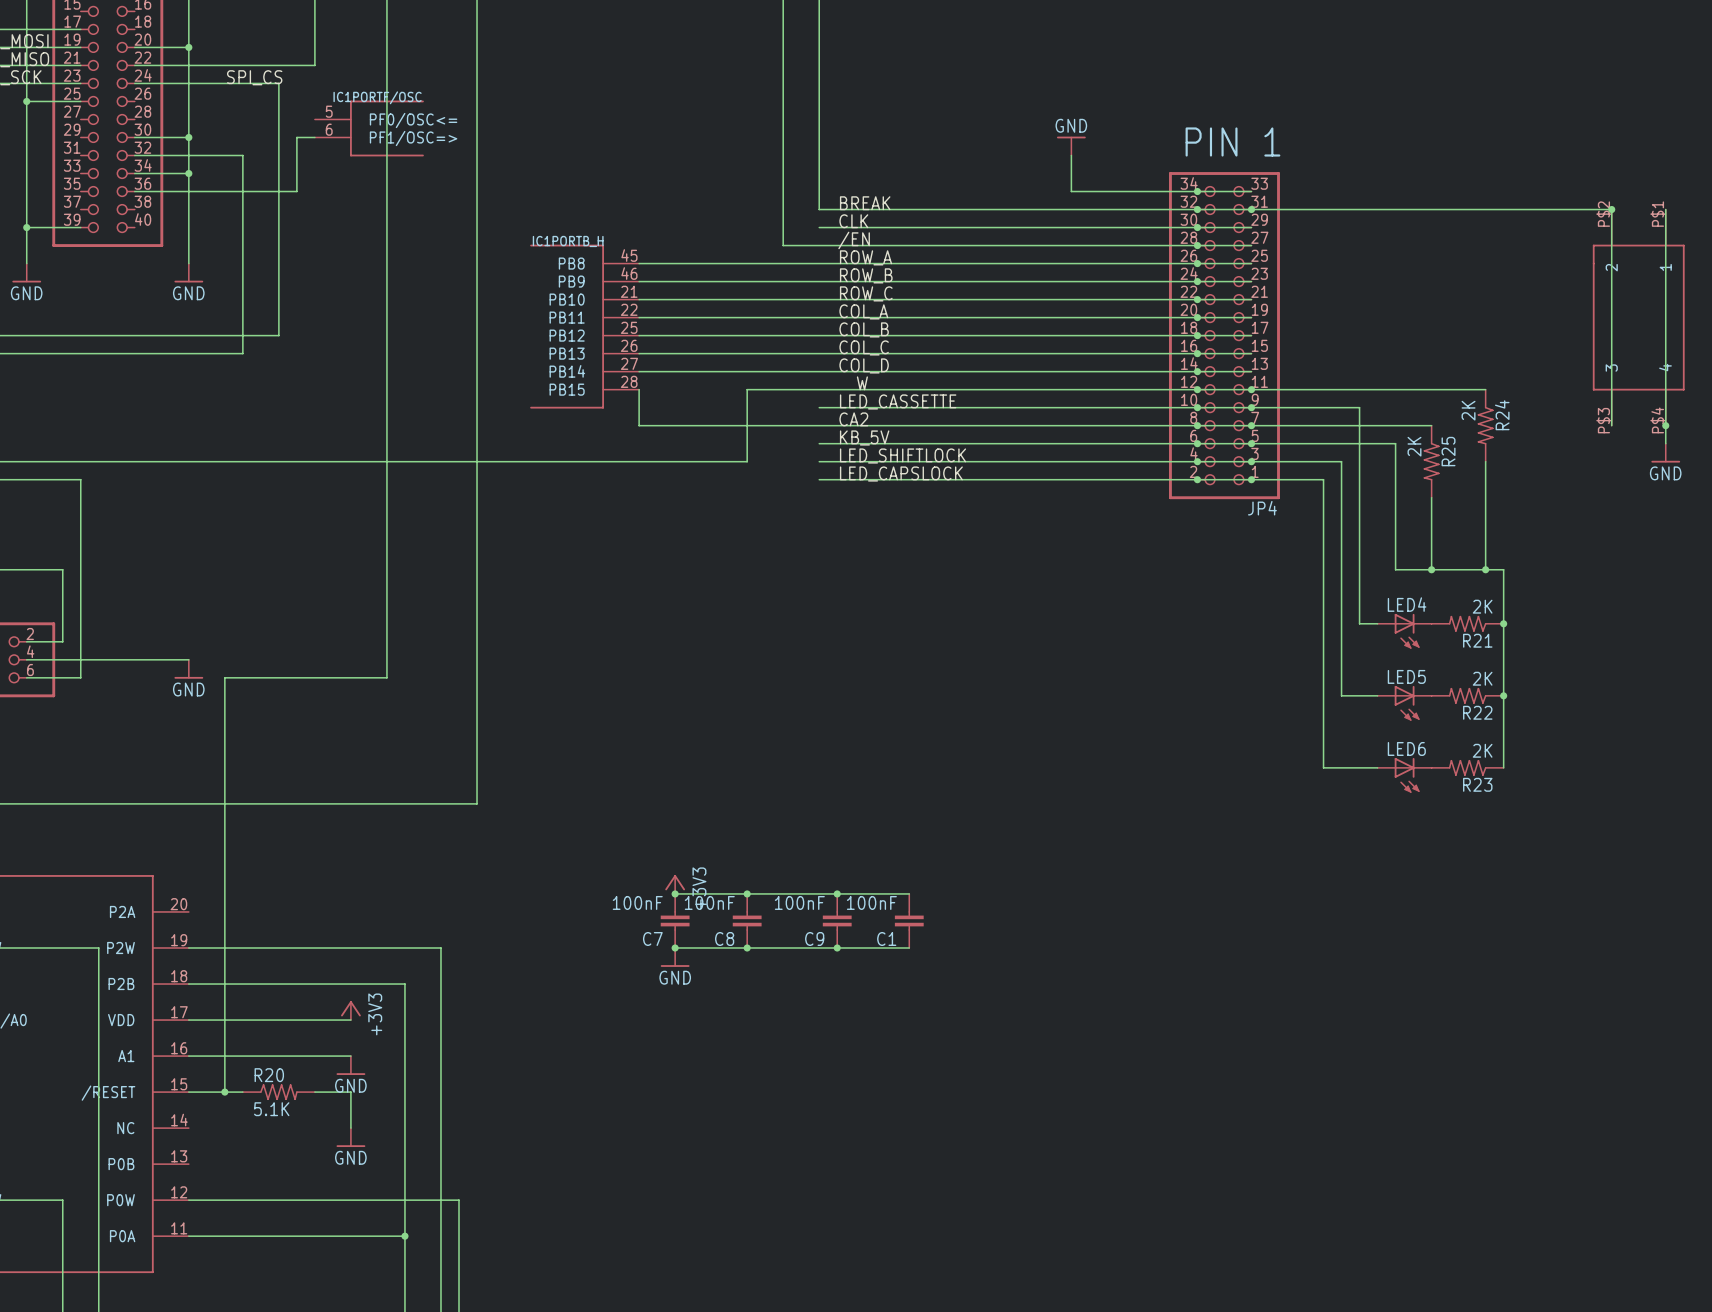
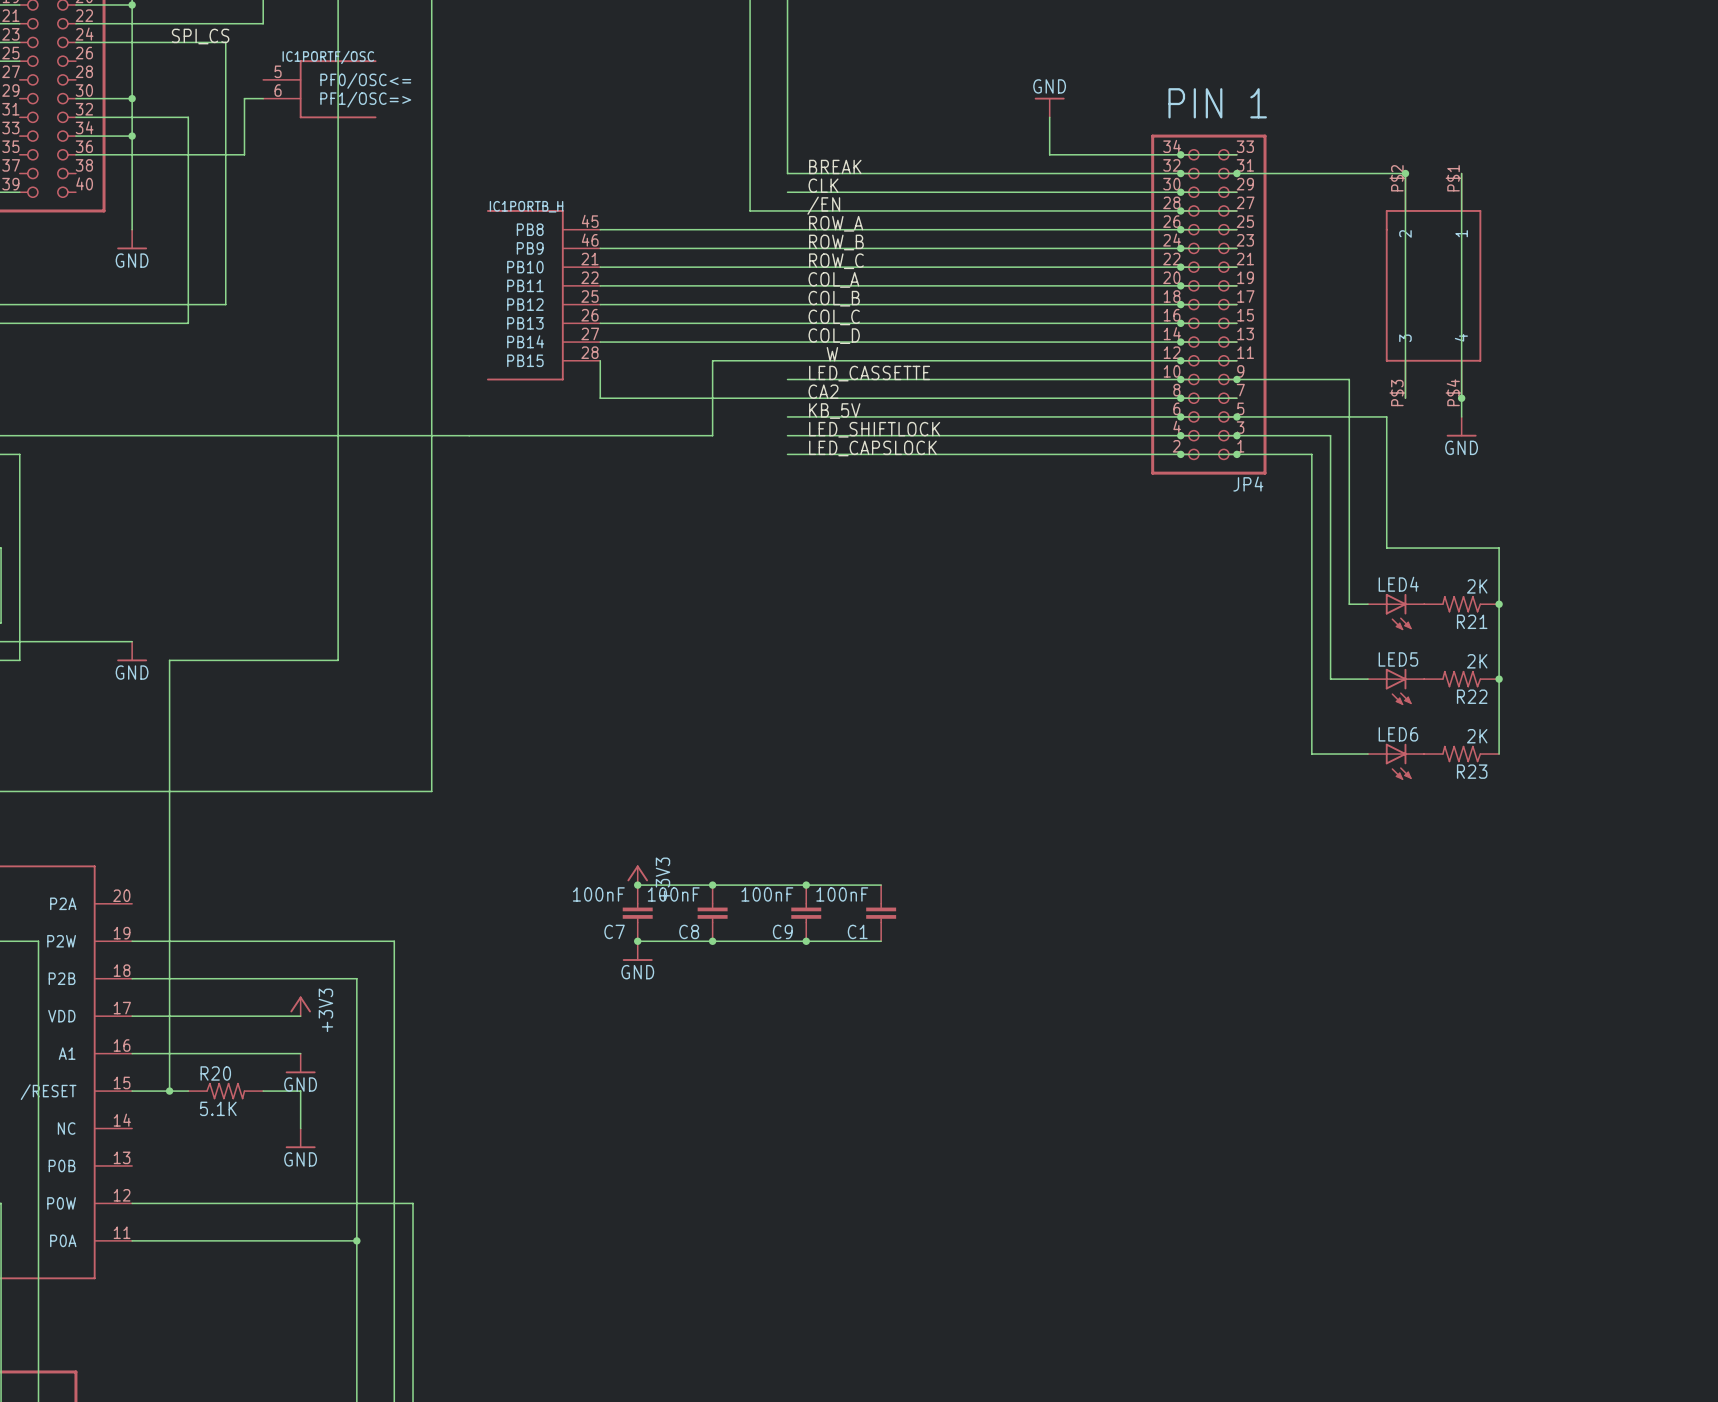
wire: (1413, 209) (1611, 209) (1611, 425) -> (1405, 173) (1405, 398)
junction: none -> (1405, 173)
wire: none -> (1461, 173) (1461, 416)
junction: (1611, 209) -> none
wire: (1665, 209) (1665, 443) -> none
part: none -> (1433, 285)
part: (1638, 317) -> none
wire: (1251, 389) (1485, 389) -> none
junction: (1251, 389) -> none
wire: (1251, 425) (1431, 425) -> none
junction: (1251, 425) -> none
junction: none -> (1461, 398)
R24: 2K (1485, 425) -> none
junction: (1665, 425) -> none
power symbol: none -> GND (1461, 426)
power symbol: GND (1665, 453) -> none
R25: 2K (1431, 461) -> none
wire: (1485, 461) (1485, 569) -> none
wire: (1431, 497) (1431, 569) -> none
junction: (1431, 569) -> none
junction: (1485, 569) -> none

